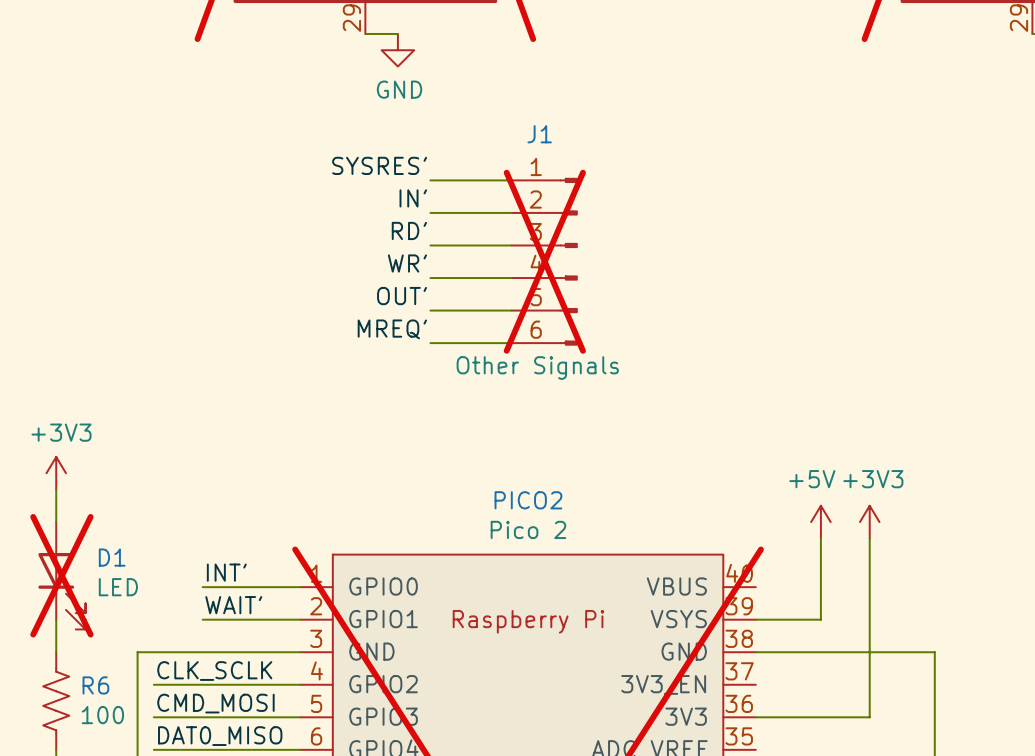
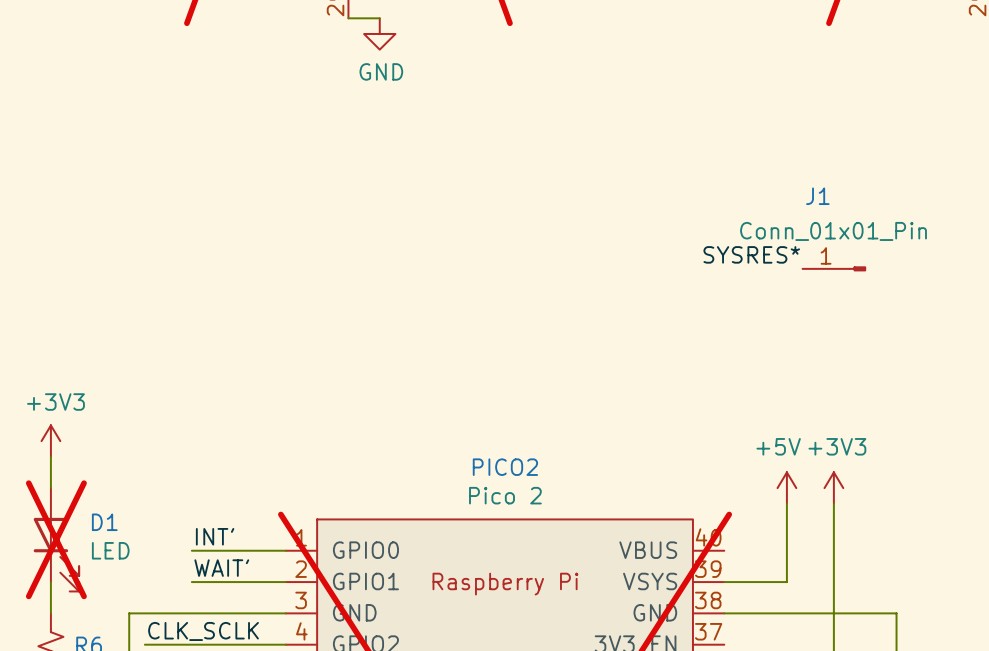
J1 name position: J1 (539, 134) -> J1 (817, 196)
label: SYSRES' (379, 165) -> none
J1 symbol: [511, 177, 578, 346] -> [802, 266, 867, 272]
wire: (430, 180) (511, 180) -> none
label: IN' (413, 198) -> none
wire: (430, 212) (511, 212) -> none
label: RD' (409, 230) -> none
wire: (430, 245) (511, 245) -> none
J1 do-not-place cross: (544, 261) -> none
label: WR' (407, 263) -> none
wire: (430, 278) (511, 278) -> none
label: none -> SYSRES* (751, 254)
label: OUT' (402, 296) -> none
wire: (430, 310) (511, 310) -> none
label: MREQ' (392, 329) -> none
wire: (430, 343) (511, 343) -> none
J1 value: Other Signals (537, 367) -> Conn_01x01_Pin (833, 231)

